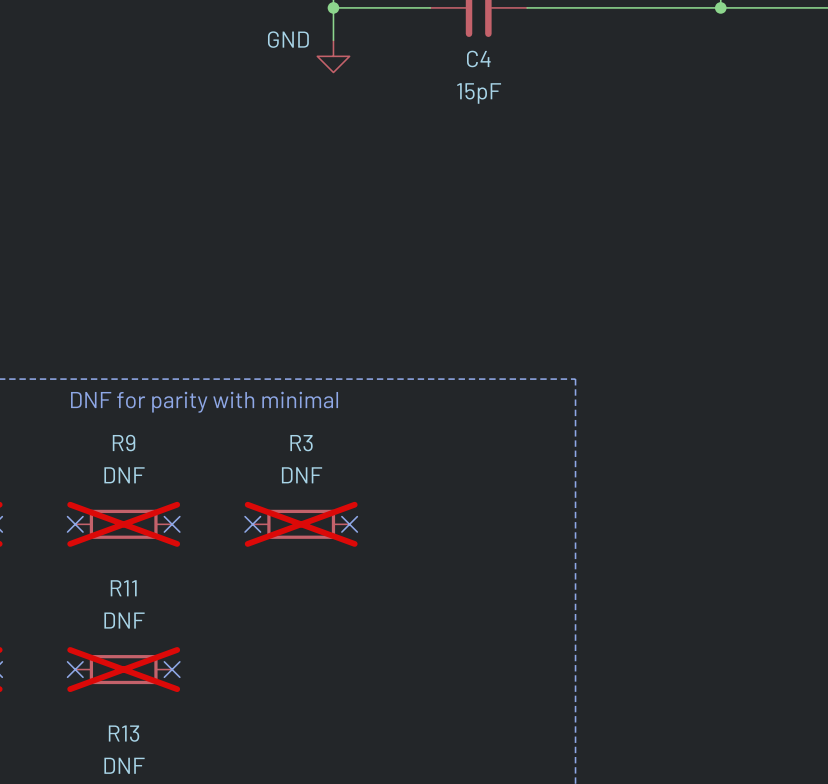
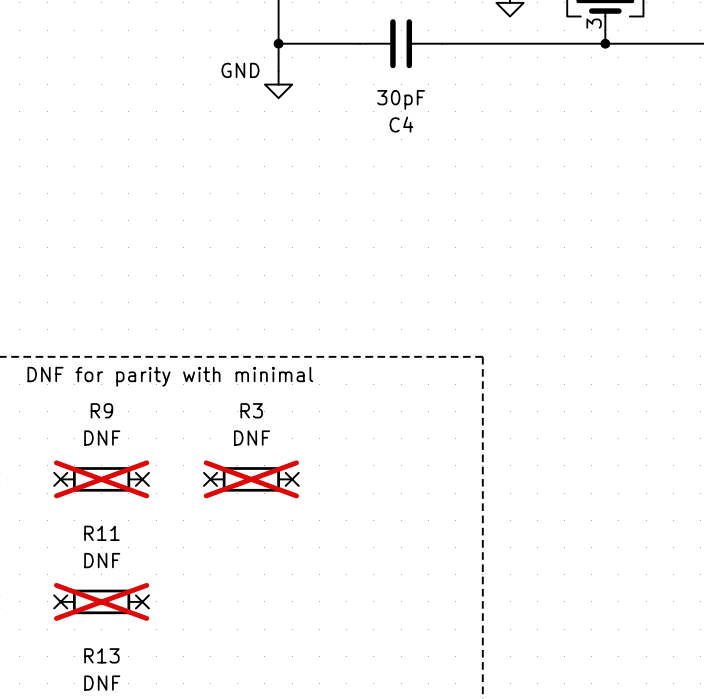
C4 name position: C4 (478, 58) -> C4 (401, 124)
C4 value: 15pF (479, 93) -> 30pF (401, 99)

